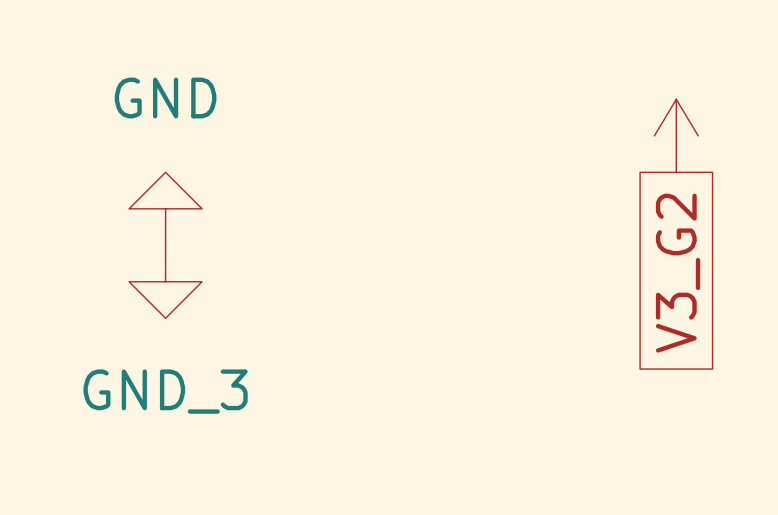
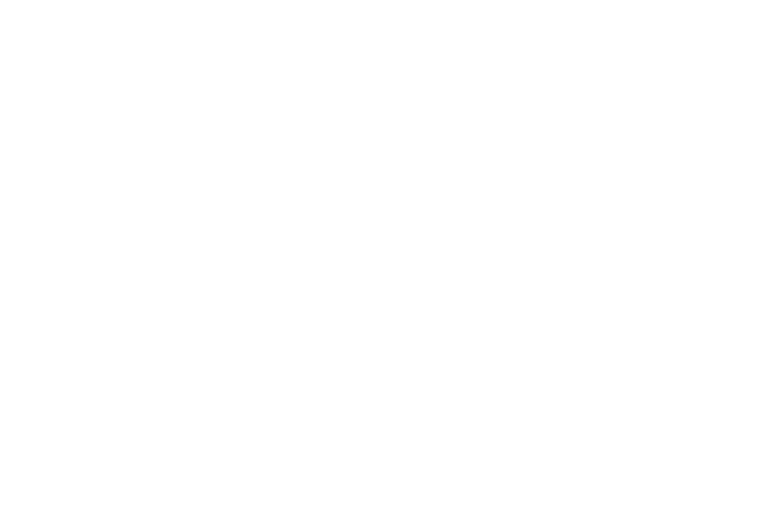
power symbol: (676, 135) -> none
power symbol: GND (165, 208) -> none
global label: V3_G2 (678, 273) -> none
power symbol: GND_3 (165, 281) -> none

